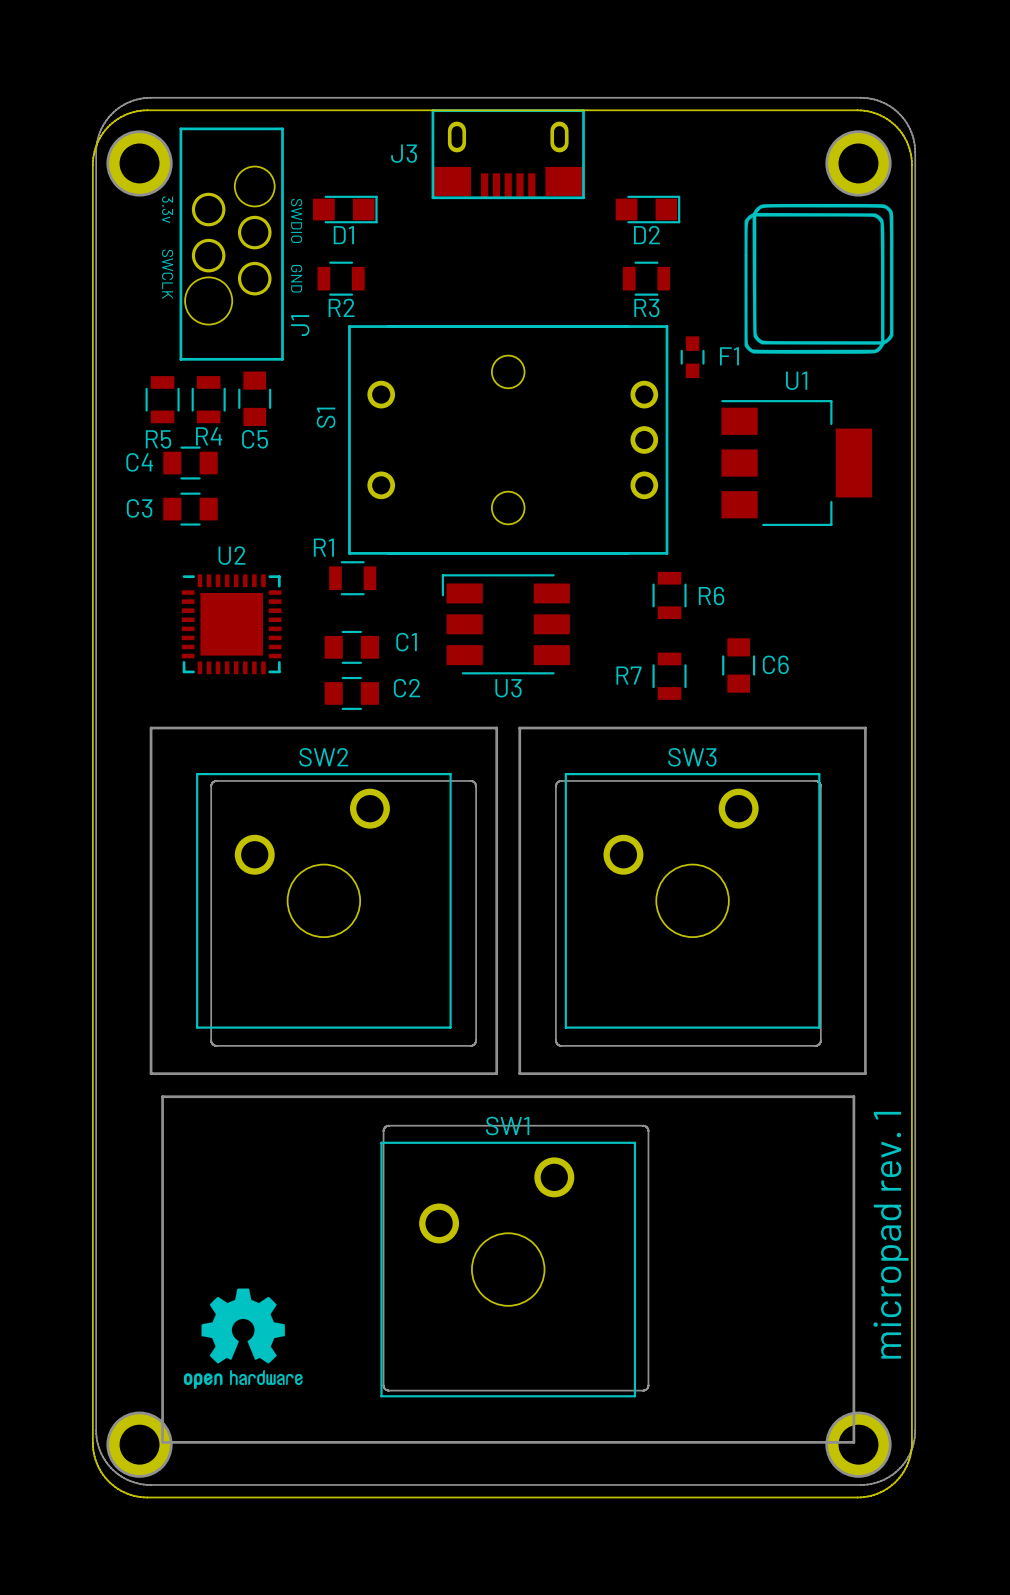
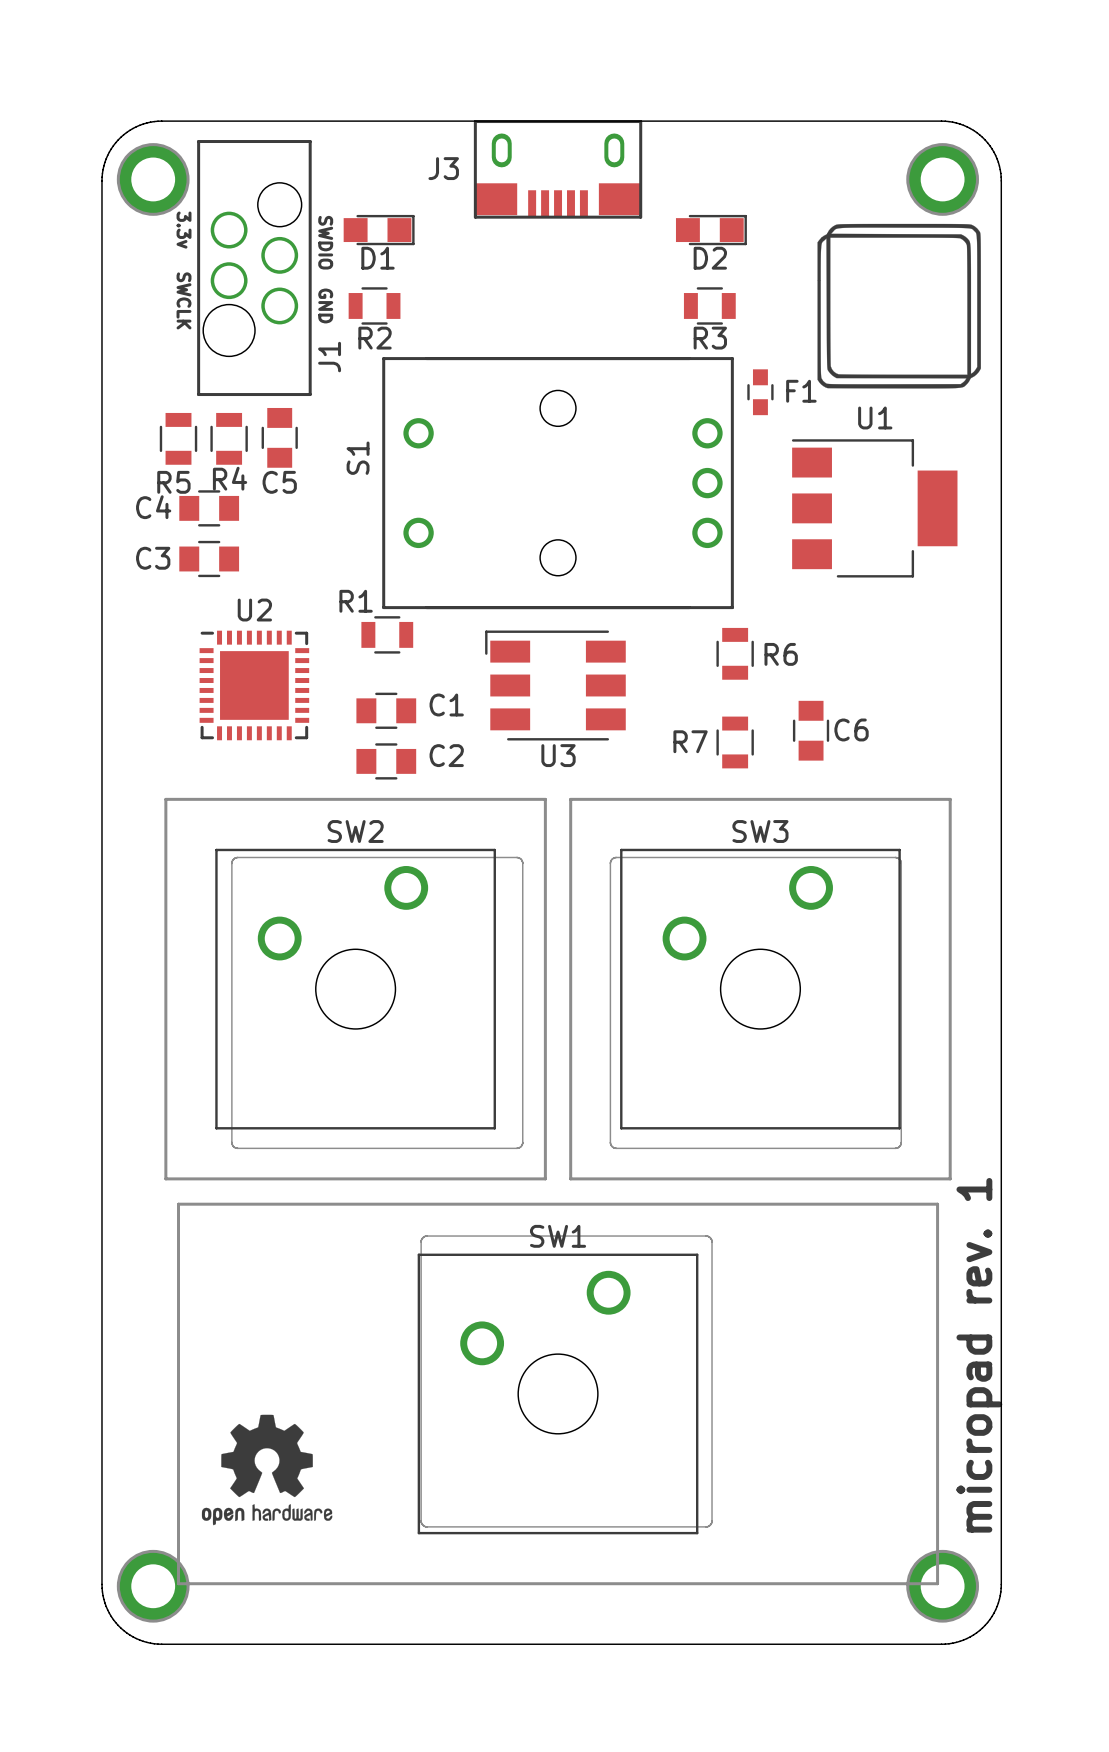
line: (150, 97) (864, 97) (877, 100) (889, 106) (900, 114) (908, 125) (913, 138) (915, 152) (915, 1430) (912, 1447) (906, 1459) (898, 1470) (886, 1478) (874, 1483) (860, 1484) (150, 1484) (133, 1482) (121, 1476) (110, 1467) (102, 1456) (97, 1444) (96, 1430) (96, 148) (101, 129) (113, 112) (130, 101) (150, 97) -> none

